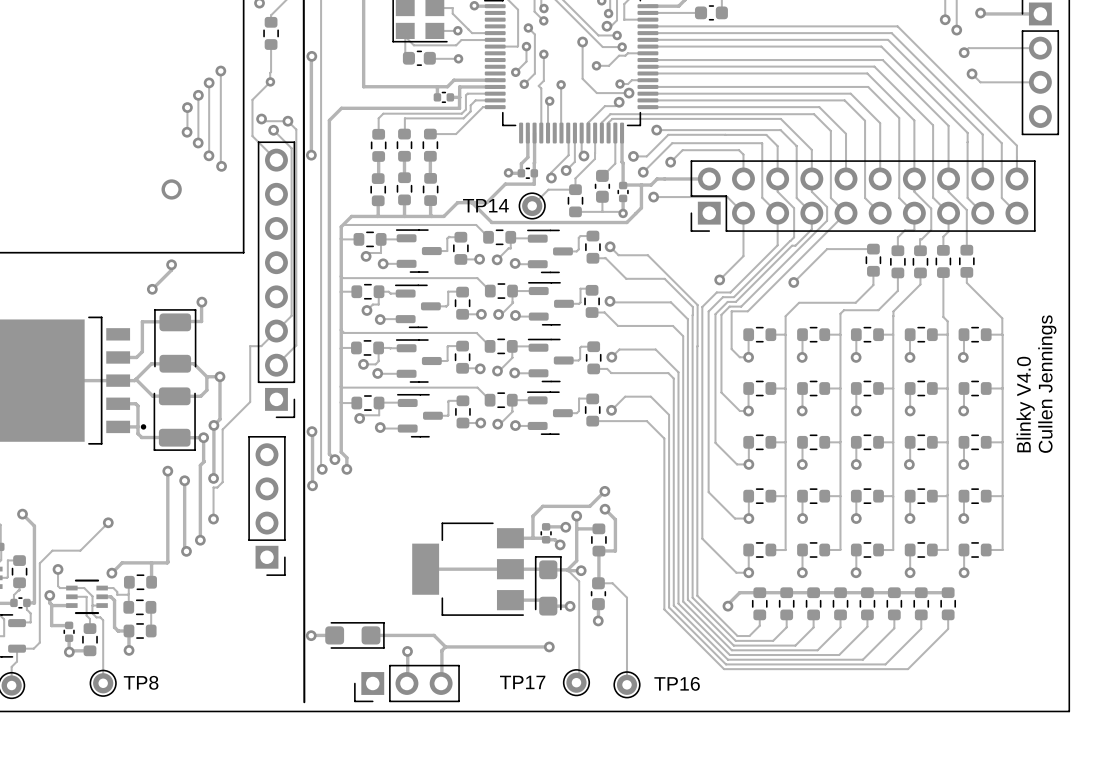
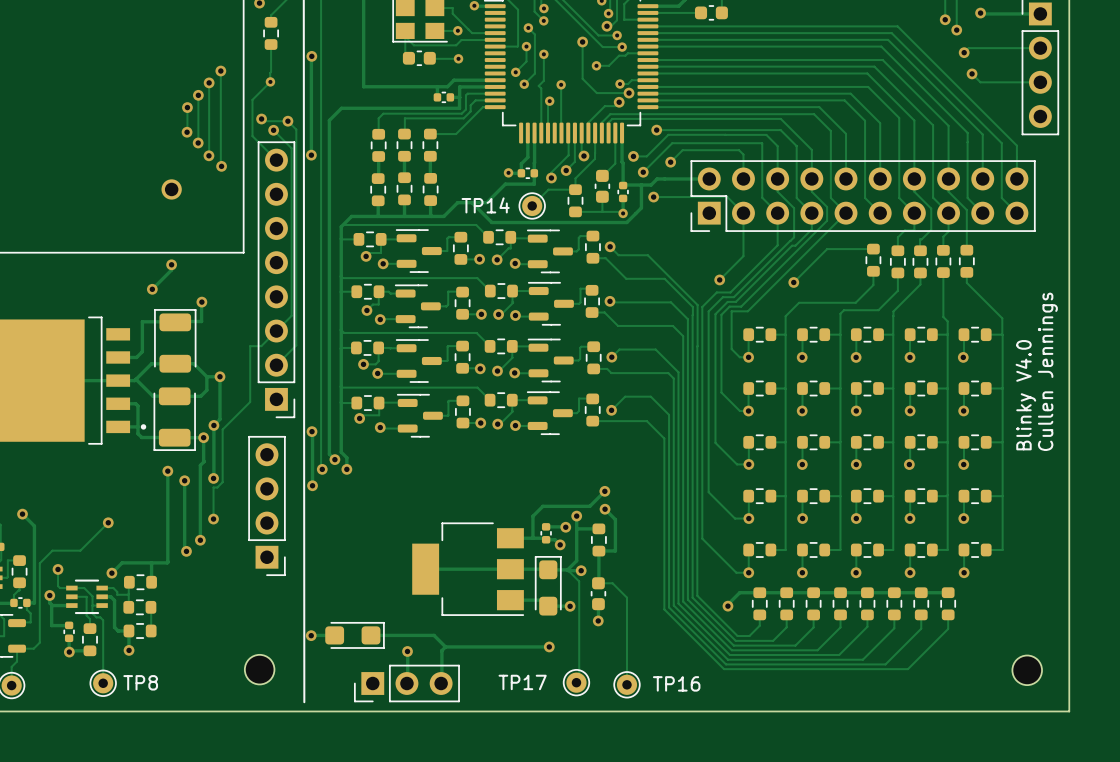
part: none -> (259, 669)
part: none -> (1027, 670)

